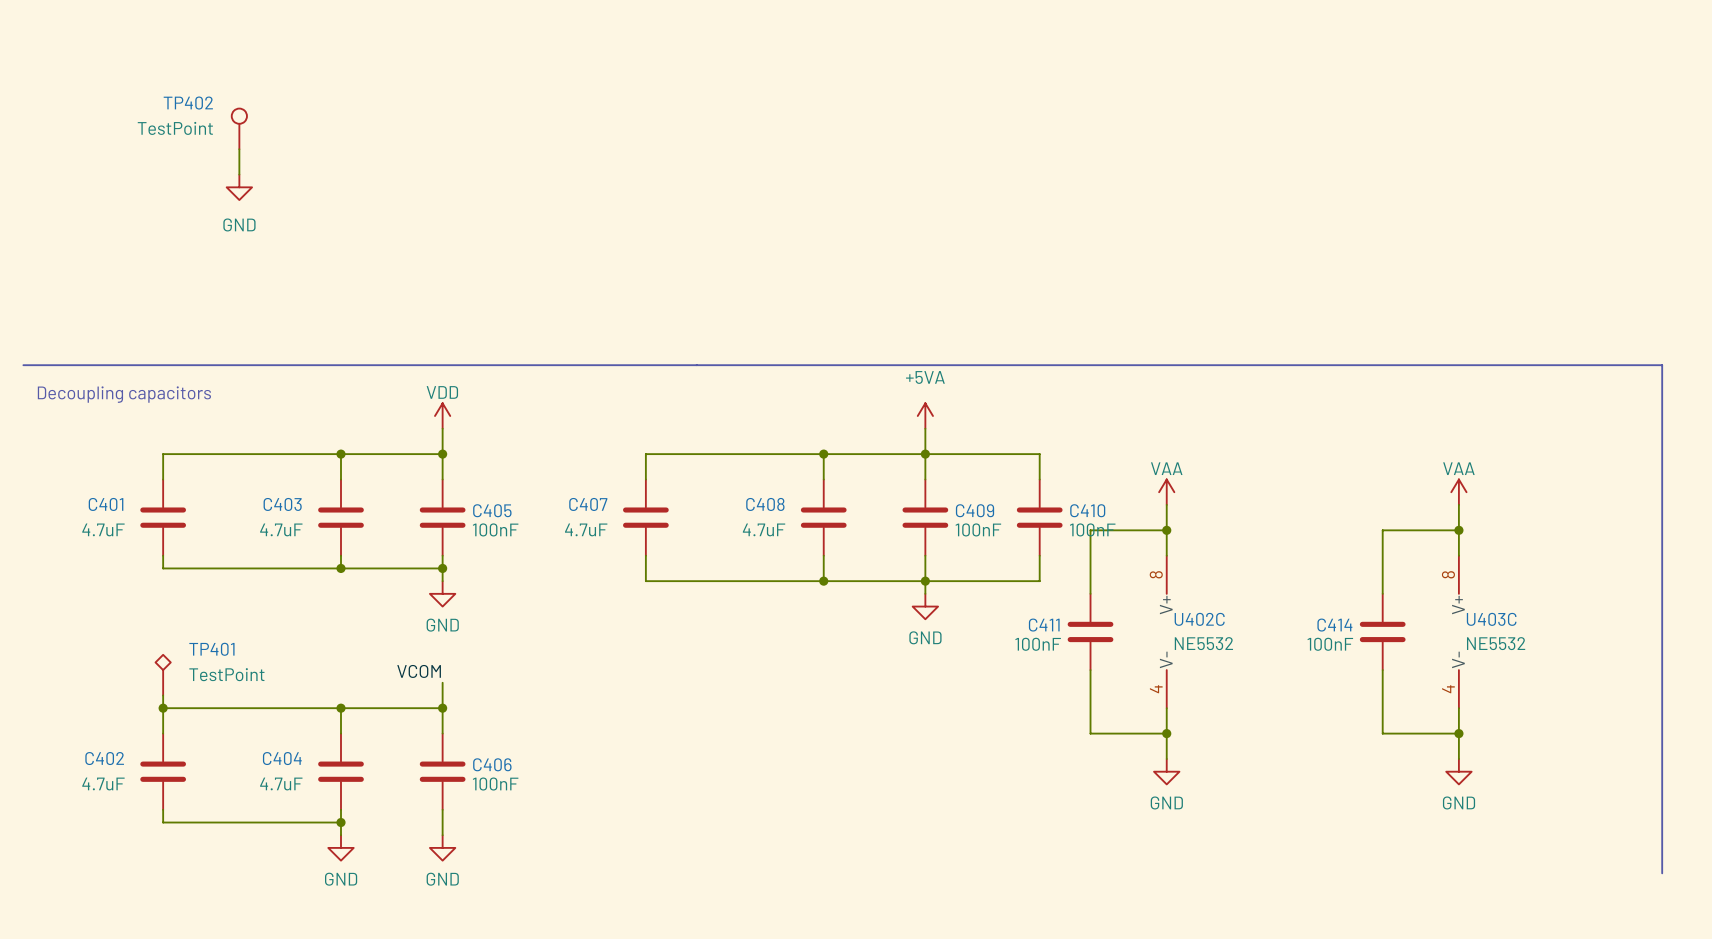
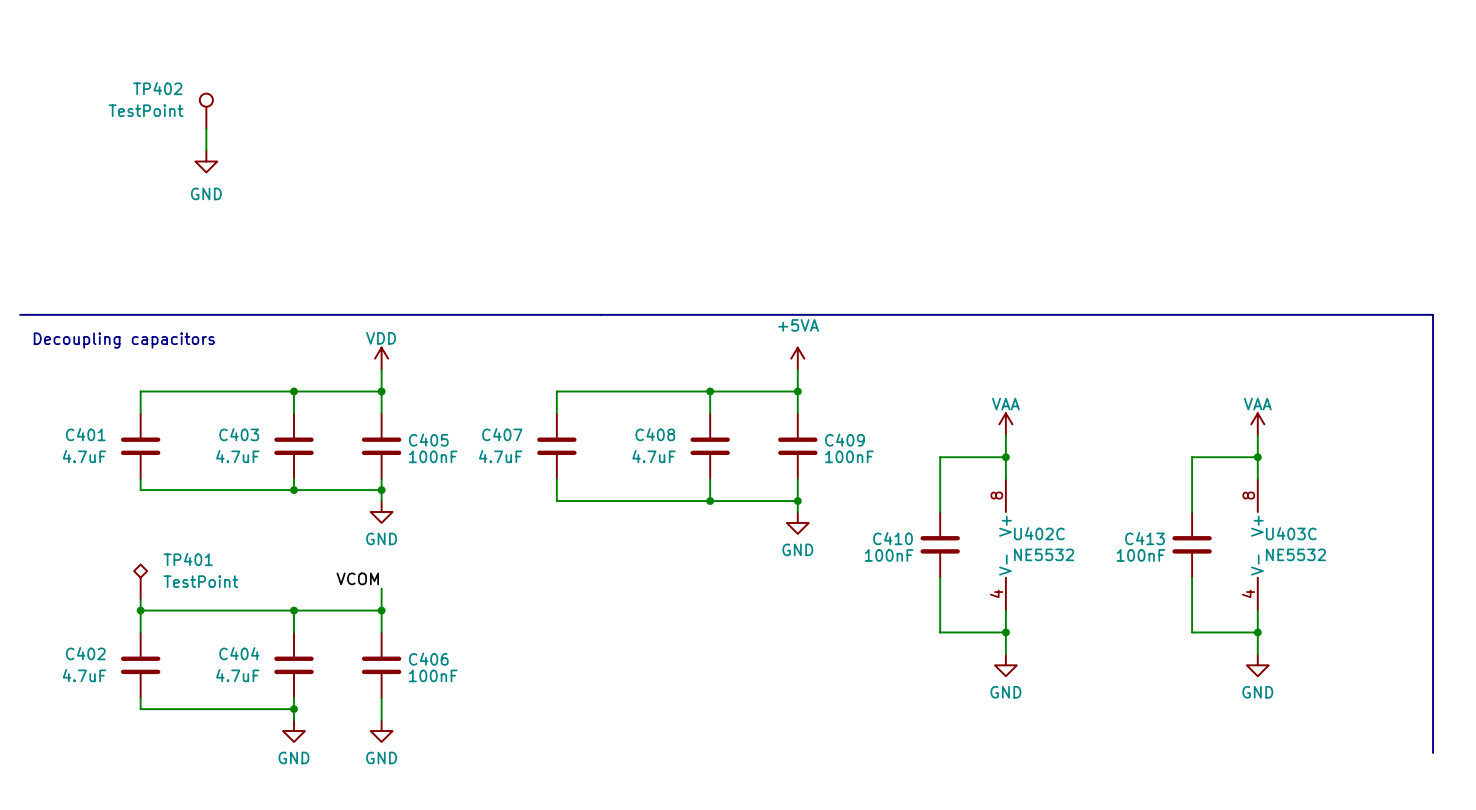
wire: (925, 454) (1039, 454) (1039, 479) -> none
C410: 100nF (1039, 517) -> none
wire: (1039, 555) (1039, 581) (925, 581) -> none
C411 name: C411 (1044, 625) -> C410 (893, 538)
C414 name: C414 (1334, 625) -> C413 (1144, 538)

